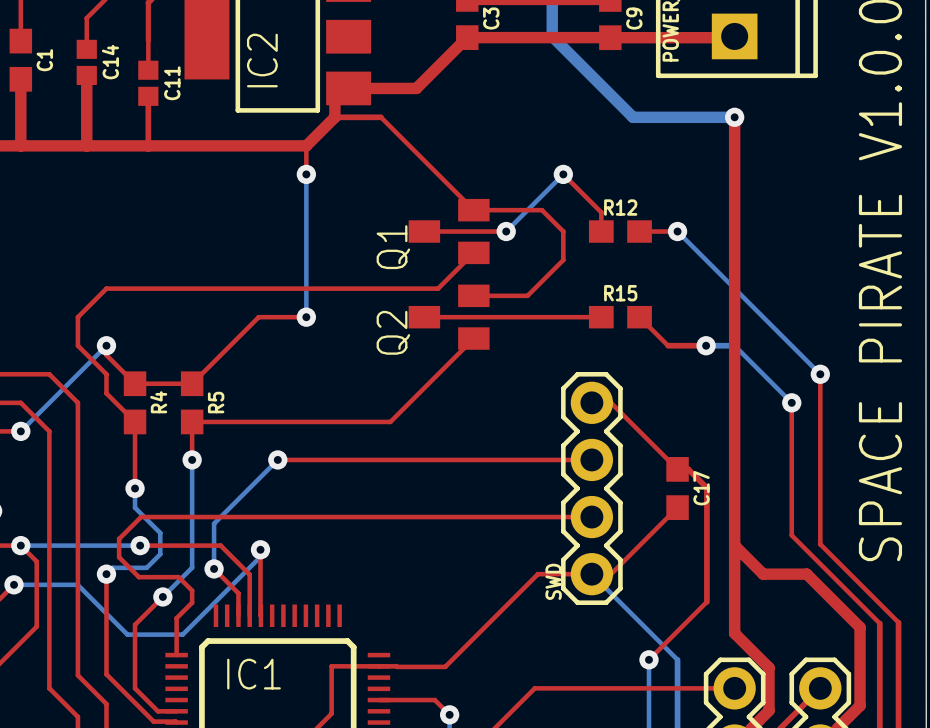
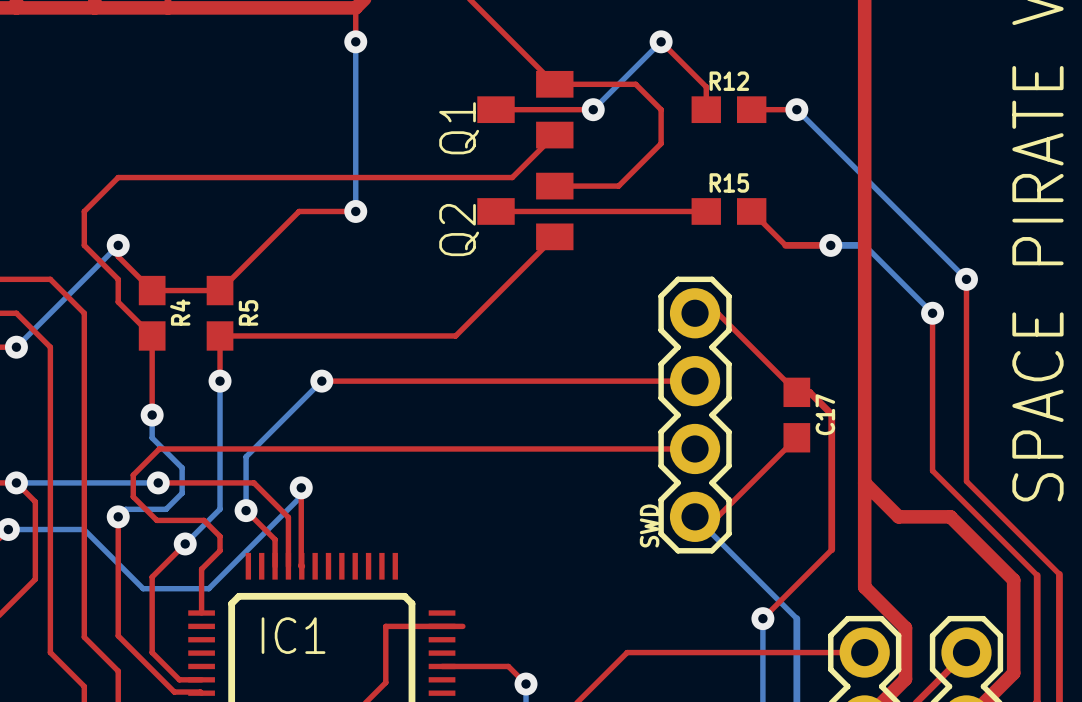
top track: (591, 574) (537, 574) (445, 666) (396, 666) -> none

